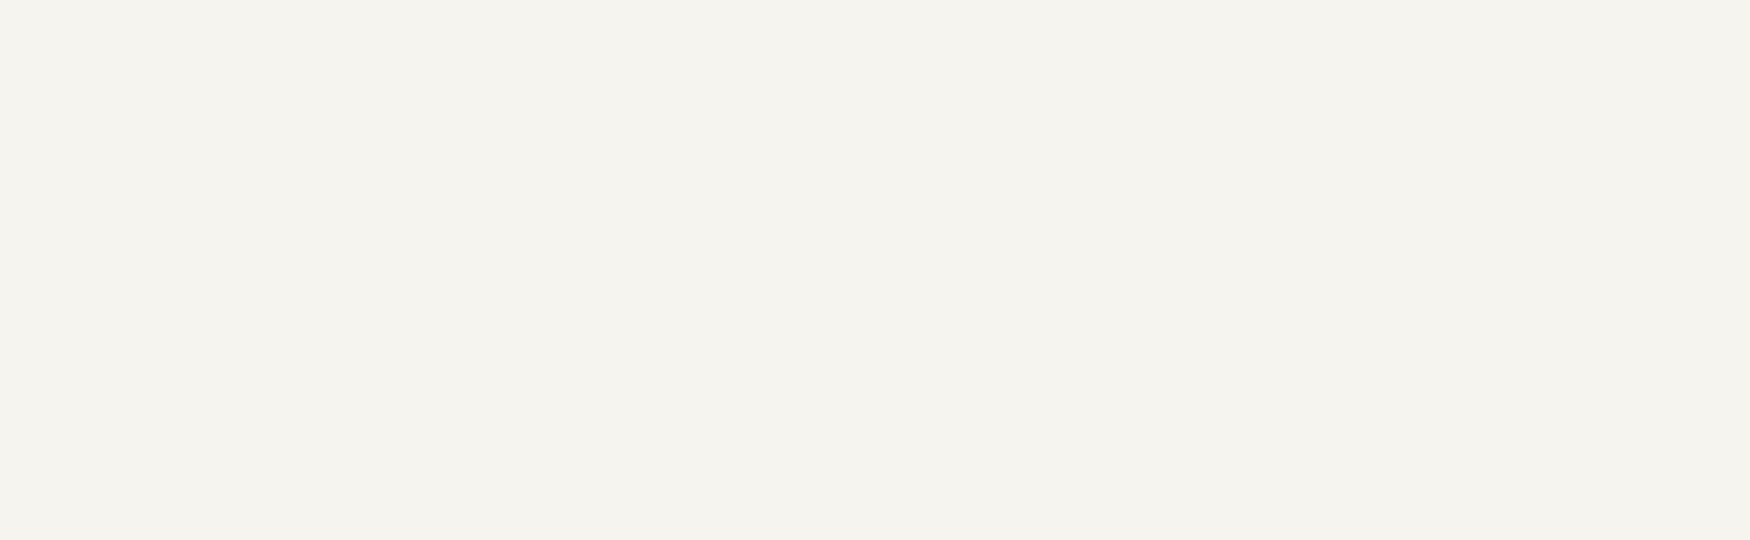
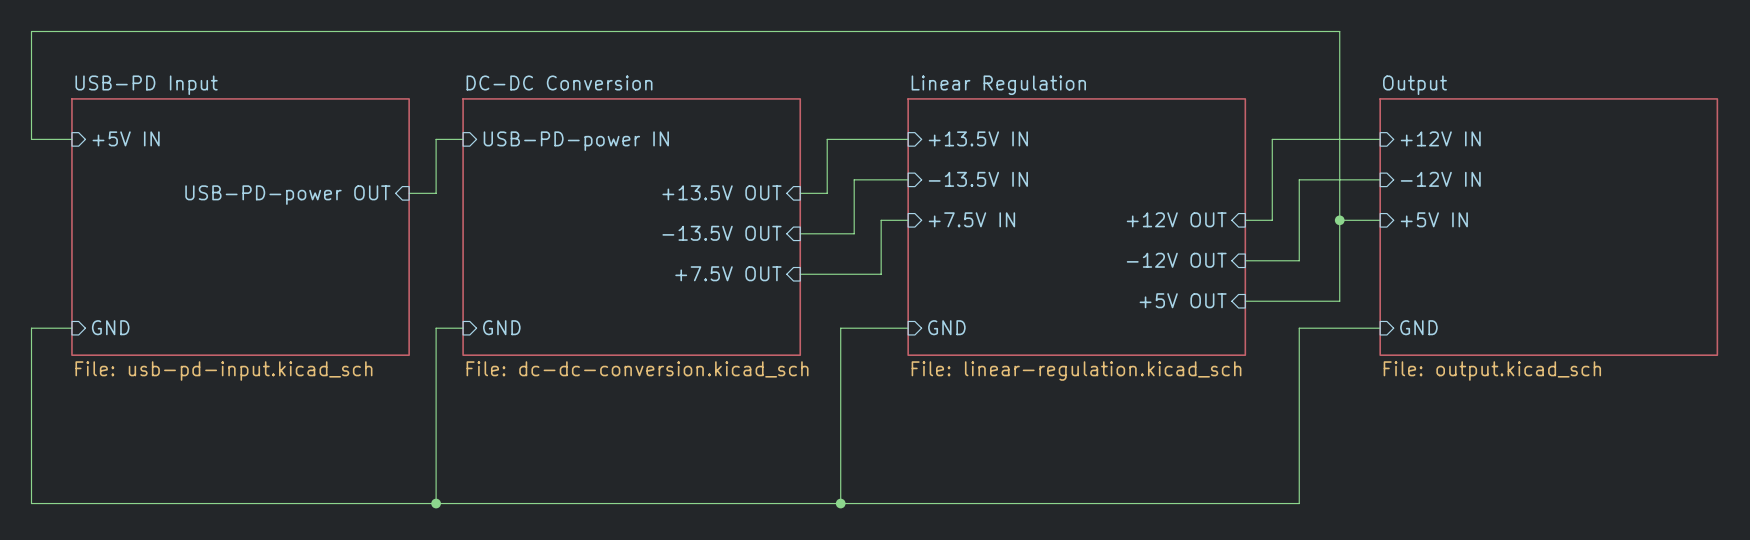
sheet pin: none -> +13.5V IN (978, 138)
sheet pin: none -> +12V IN (1440, 138)
wire: none -> (71, 139) (31, 139) (31, 31) (1339, 31) (1339, 301) (1245, 301)
sheet pin: none -> +5V IN (126, 138)
wire: none -> (463, 139) (436, 139) (436, 193) (409, 193)
wire: none -> (908, 139) (827, 139) (827, 193) (800, 193)
wire: none -> (1380, 139) (1272, 139) (1272, 220) (1245, 220)
sheet pin: none -> USB-PD-power IN (576, 141)
wire: none -> (908, 179) (854, 179) (854, 233) (800, 233)
sheet pin: none -> -13.5V IN (978, 179)
wire: none -> (1380, 179) (1299, 179) (1299, 260) (1245, 260)
sheet pin: none -> -12V IN (1440, 179)
sheet pin: none -> +13.5V OUT (722, 192)
sheet pin: none -> USB-PD-power OUT (287, 195)
sheet pin: none -> +7.5V IN (971, 219)
sheet pin: none -> +12V OUT (1176, 219)
sheet pin: none -> +5V IN (1434, 219)
wire: none -> (908, 220) (881, 220) (881, 274) (800, 274)
wire: none -> (1339, 220) (1380, 220)
junction: none -> (1339, 220)
sheet USB-PD Input: none -> File: usb-pd-input.kicad_sch (240, 227)
sheet DC-DC Conversion: none -> File: dc-dc-conversion.kicad_sch (631, 227)
sheet Linear Regulation: none -> File: linear-regulation.kicad_sch (1076, 227)
sheet Output: none -> File: output.kicad_sch (1548, 227)
sheet pin: none -> -13.5V OUT (722, 233)
sheet pin: none -> -12V OUT (1176, 260)
sheet pin: none -> +7.5V OUT (728, 273)
sheet pin: none -> +5V OUT (1183, 300)
sheet pin: none -> GND (110, 327)
sheet pin: none -> GND (501, 327)
sheet pin: none -> GND (946, 327)
sheet pin: none -> GND (1418, 327)
wire: none -> (71, 328) (31, 328) (31, 503) (1299, 503) (1299, 328) (1380, 328)
wire: none -> (463, 328) (436, 328) (436, 503)
wire: none -> (908, 328) (840, 328) (840, 503)
junction: none -> (436, 503)
junction: none -> (840, 503)

